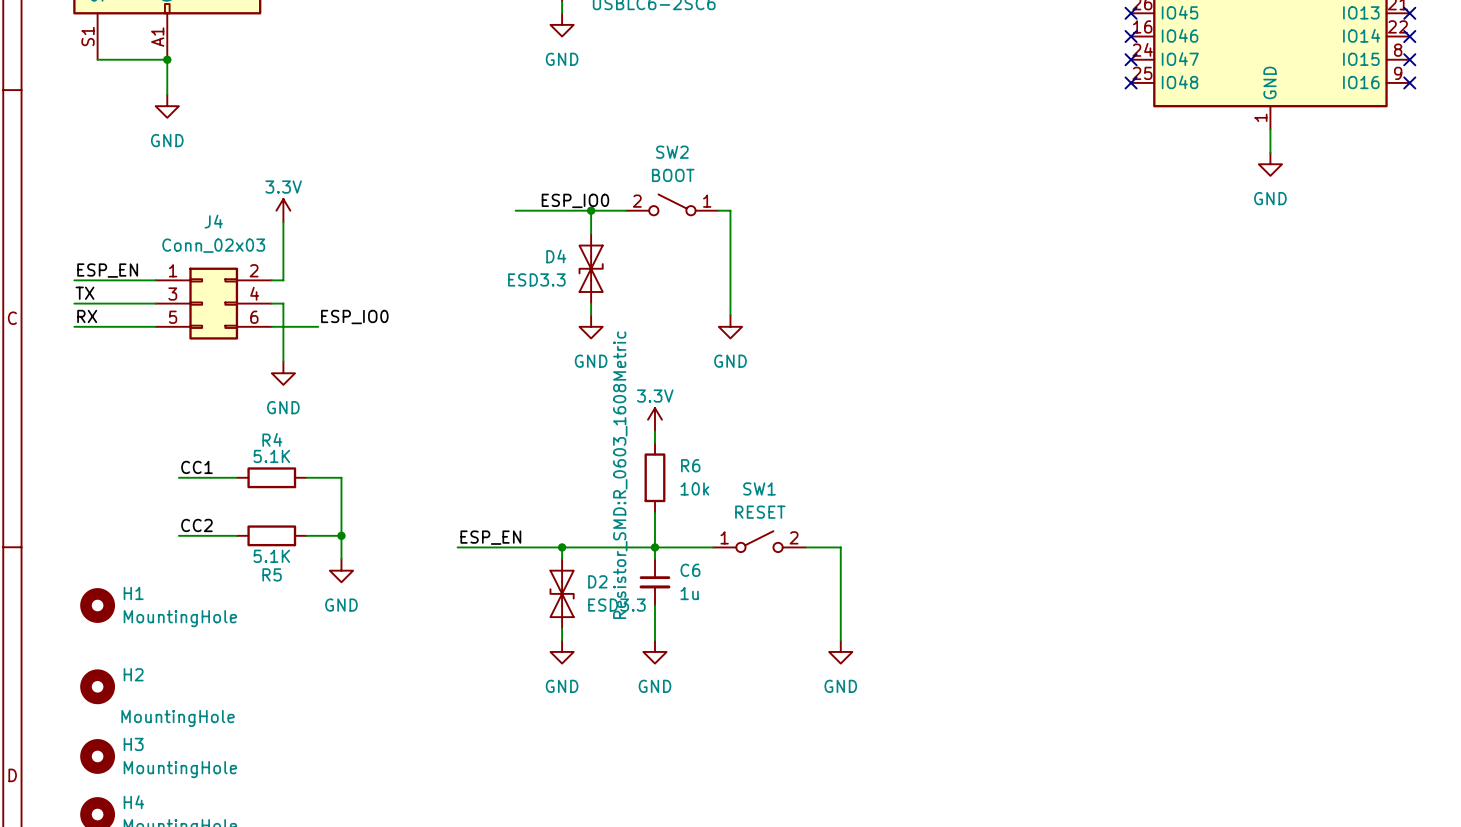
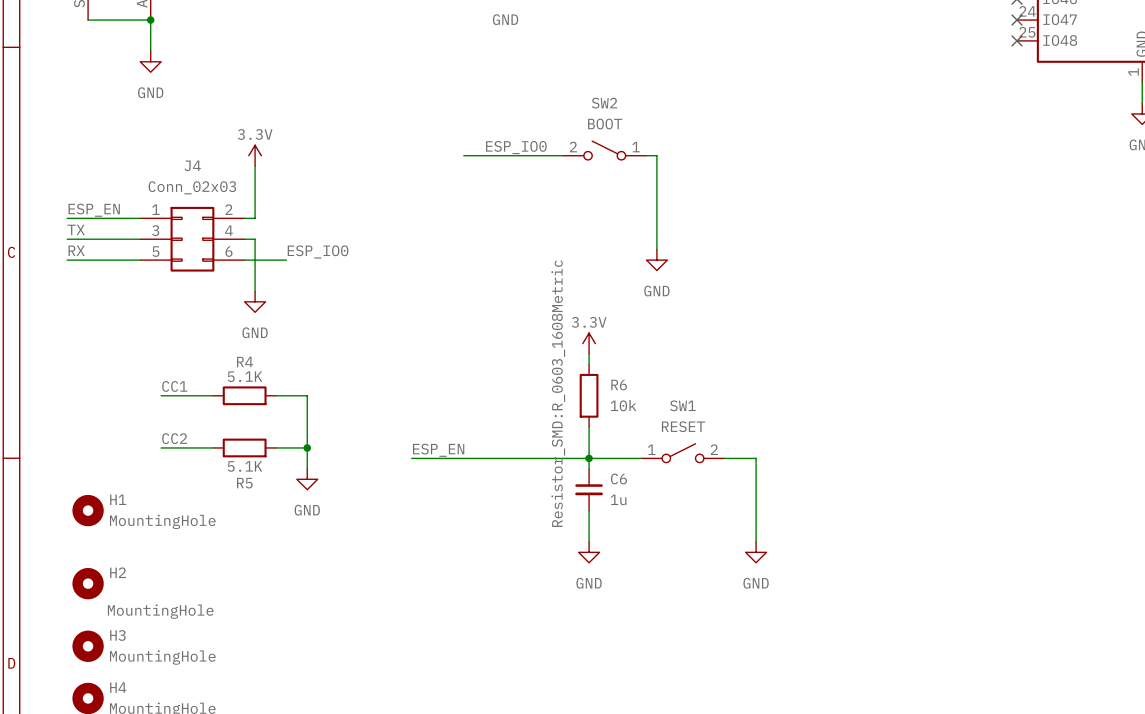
wire: (591, 210) (591, 233) -> none
junction: (591, 210) -> none
D4: ESD3.3 (591, 268) -> none
wire: (591, 303) (591, 315) -> none
power symbol: GND (591, 326) -> none
wire: (562, 547) (562, 559) -> none
junction: (562, 547) -> none
D2: ESD3.3 (562, 593) -> none
wire: (562, 628) (562, 640) -> none
power symbol: GND (562, 651) -> none

